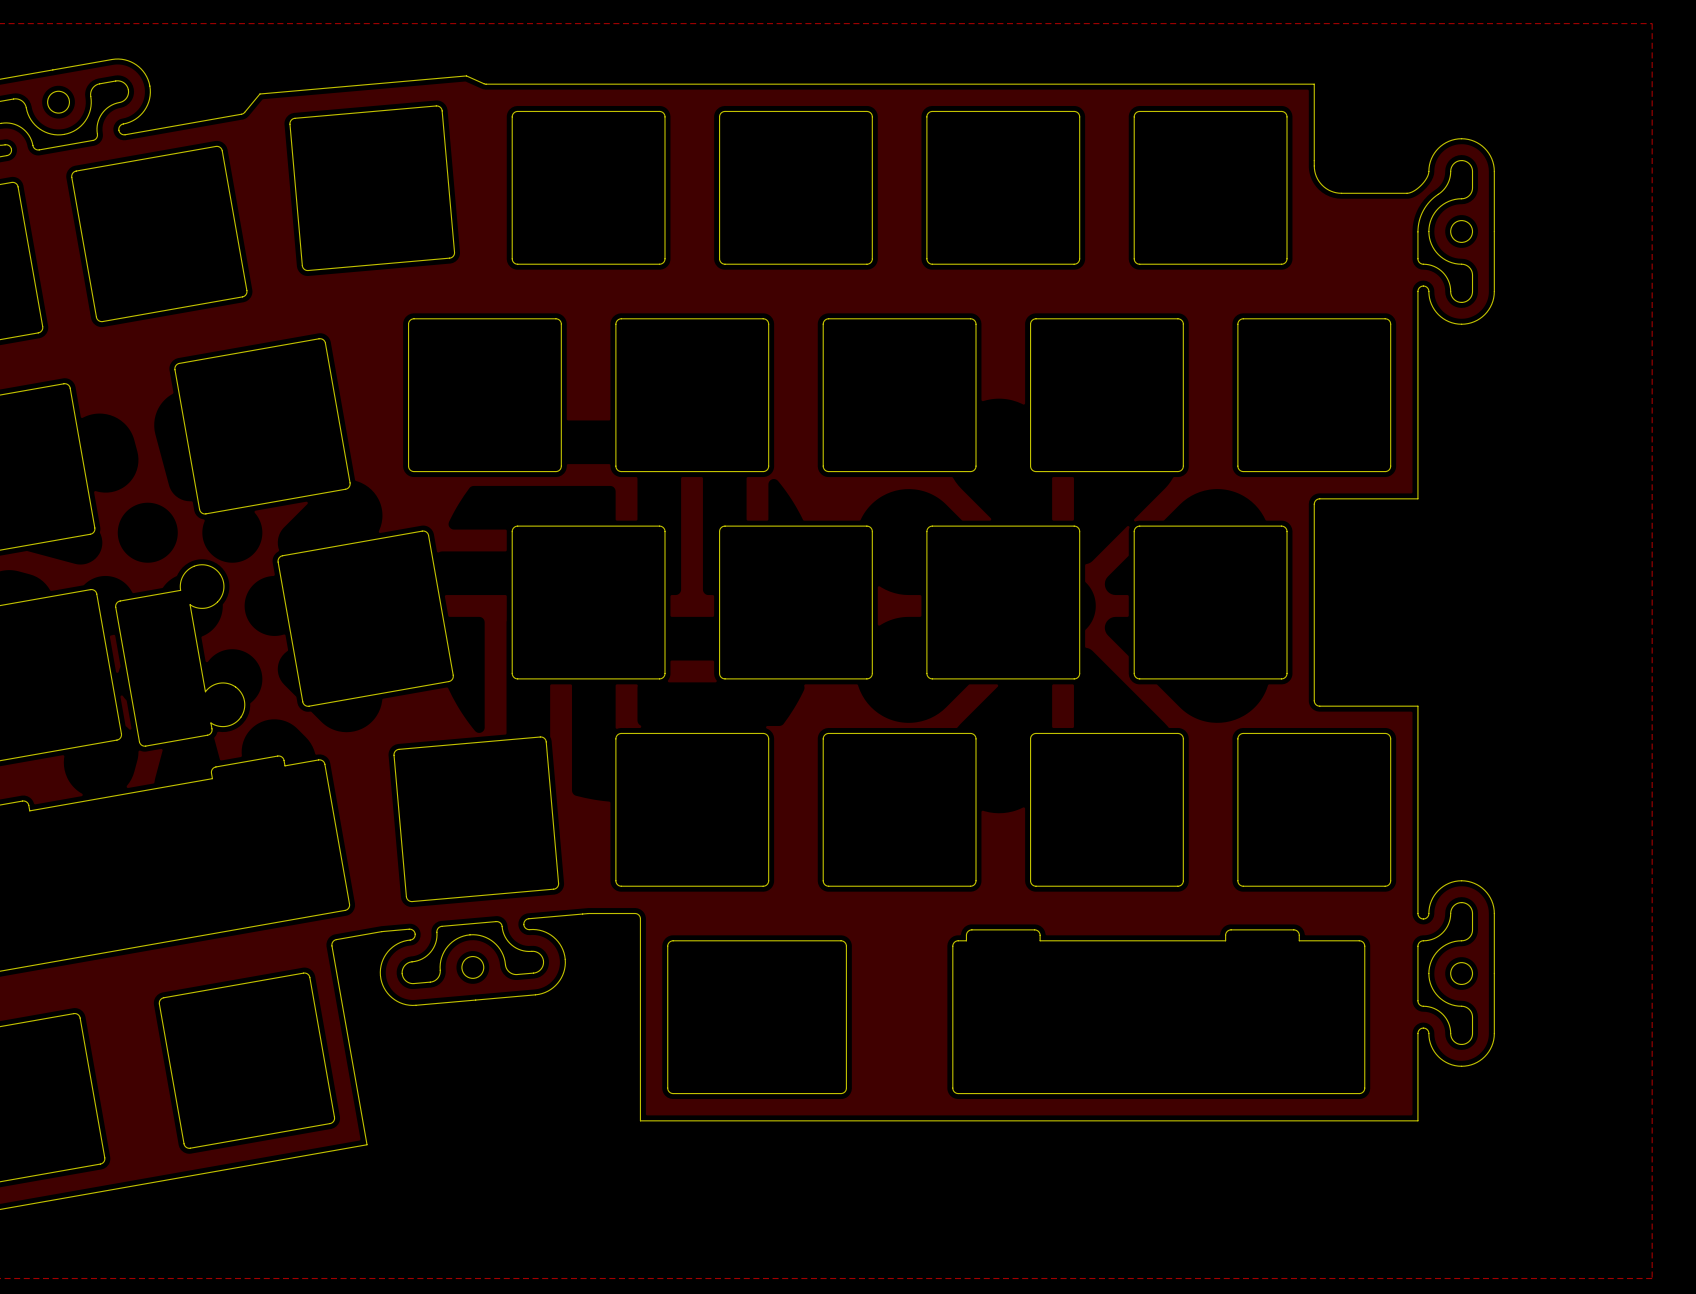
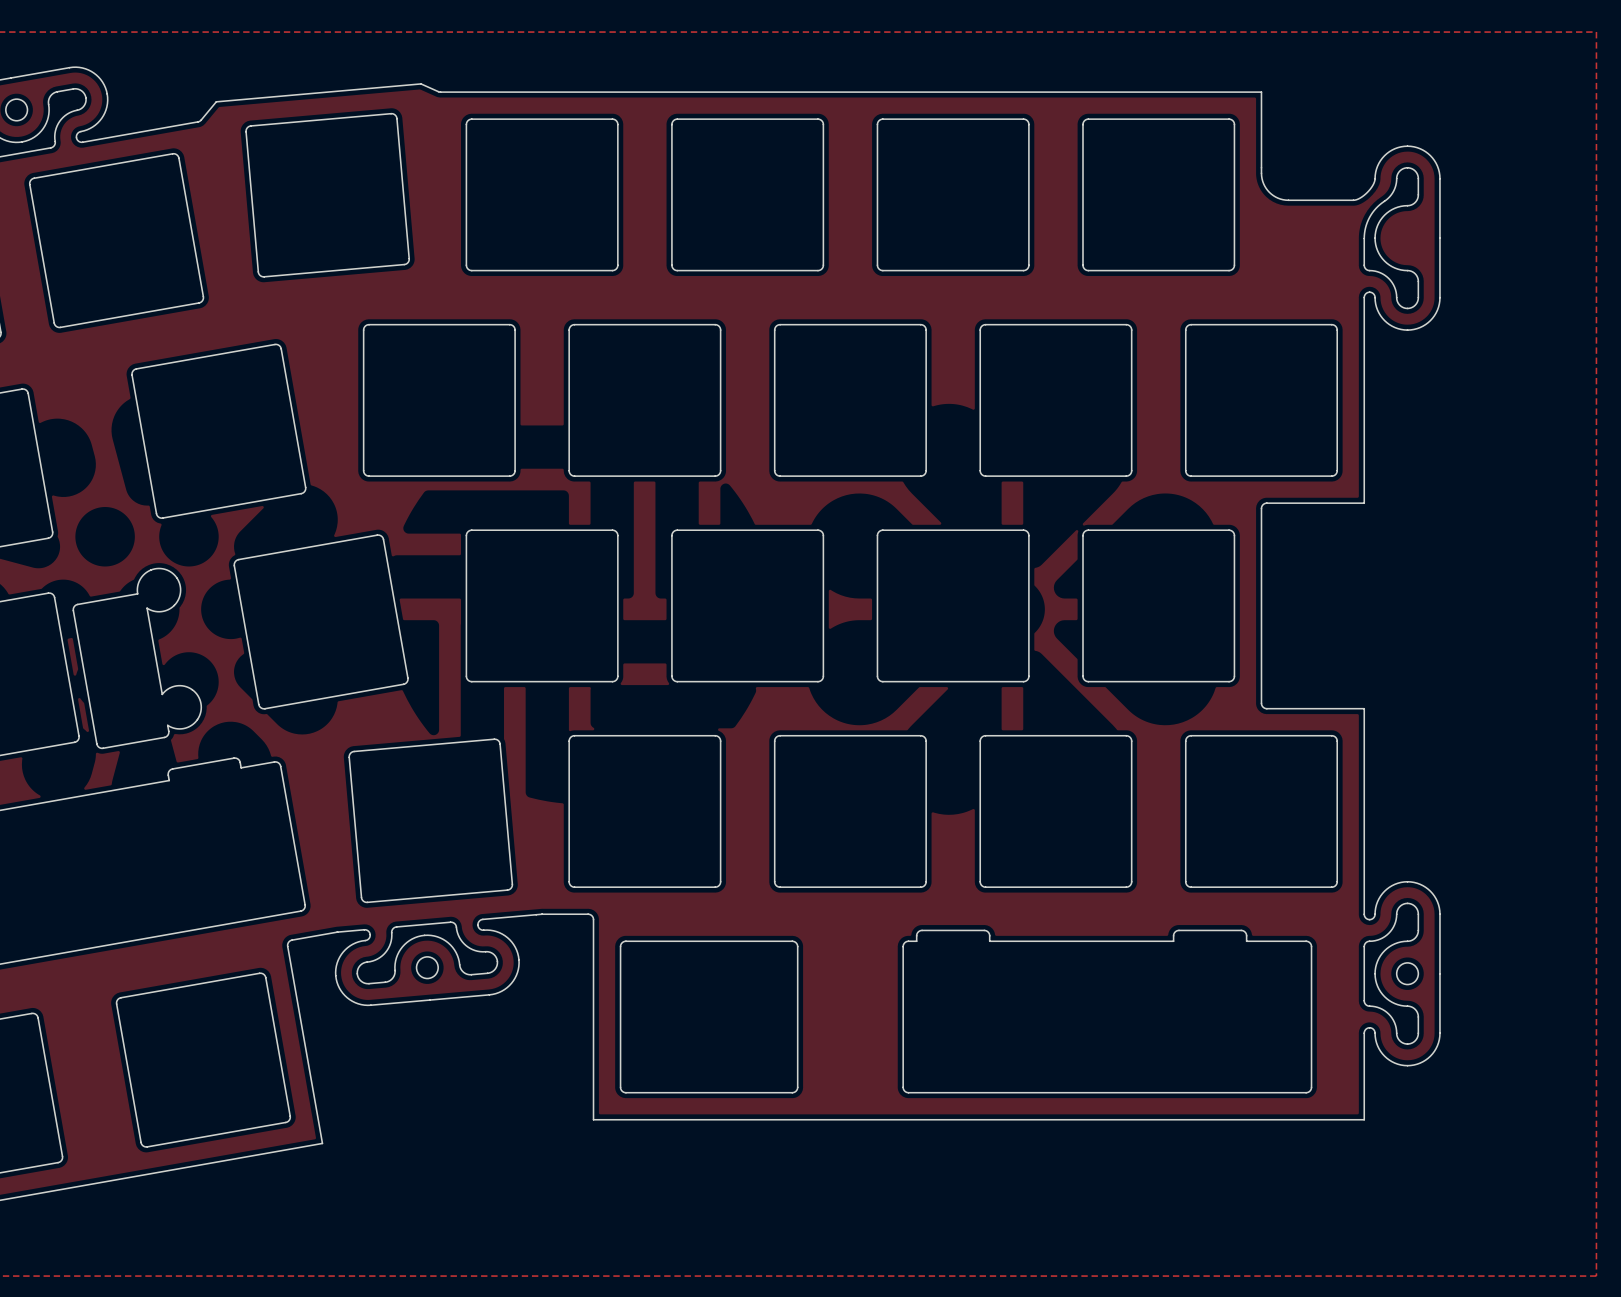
round board edge: [1450, 220, 1474, 243] -> none

